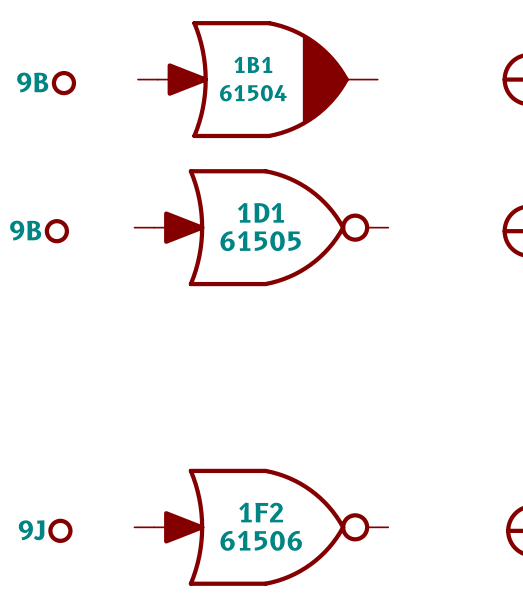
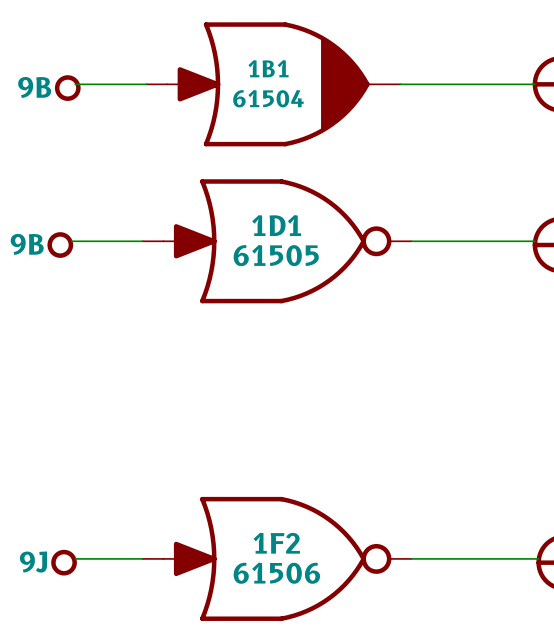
wire: none -> (75, 84) (146, 84)
wire: none -> (400, 84) (534, 84)
wire: none -> (71, 241) (142, 241)
wire: none -> (411, 241) (534, 241)
wire: none -> (75, 558) (142, 558)
wire: none -> (411, 558) (538, 558)

